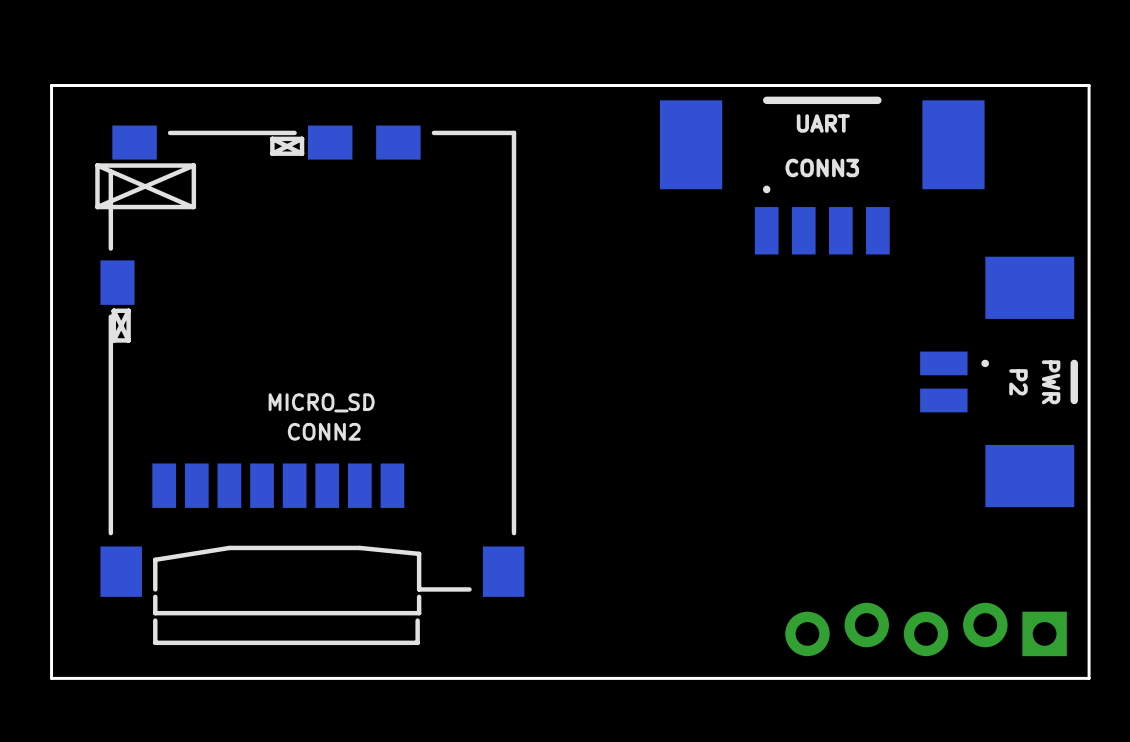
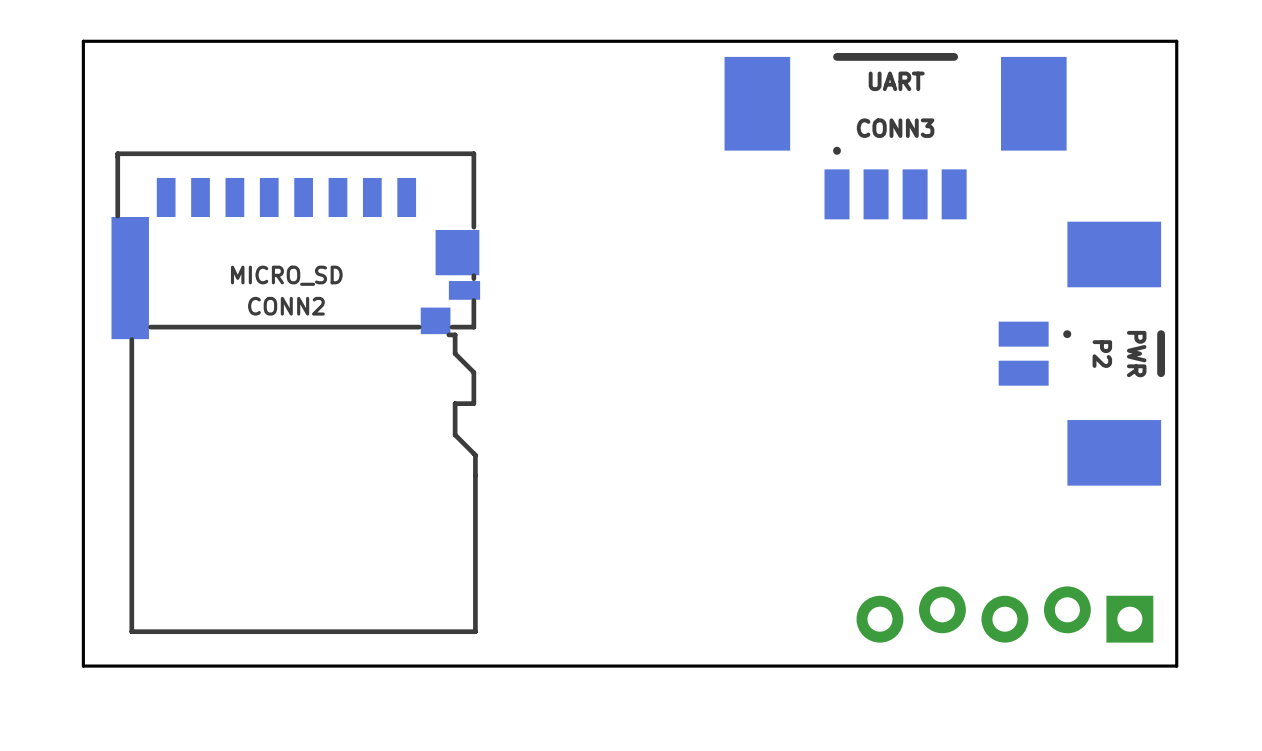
CONN2 footprint: [95, 125, 525, 646] -> [111, 151, 481, 635]
CONN2 value position: MICRO_SD (321, 402) -> MICRO_SD (286, 275)
CONN2 name position: CONN2 (324, 431) -> CONN2 (286, 306)

